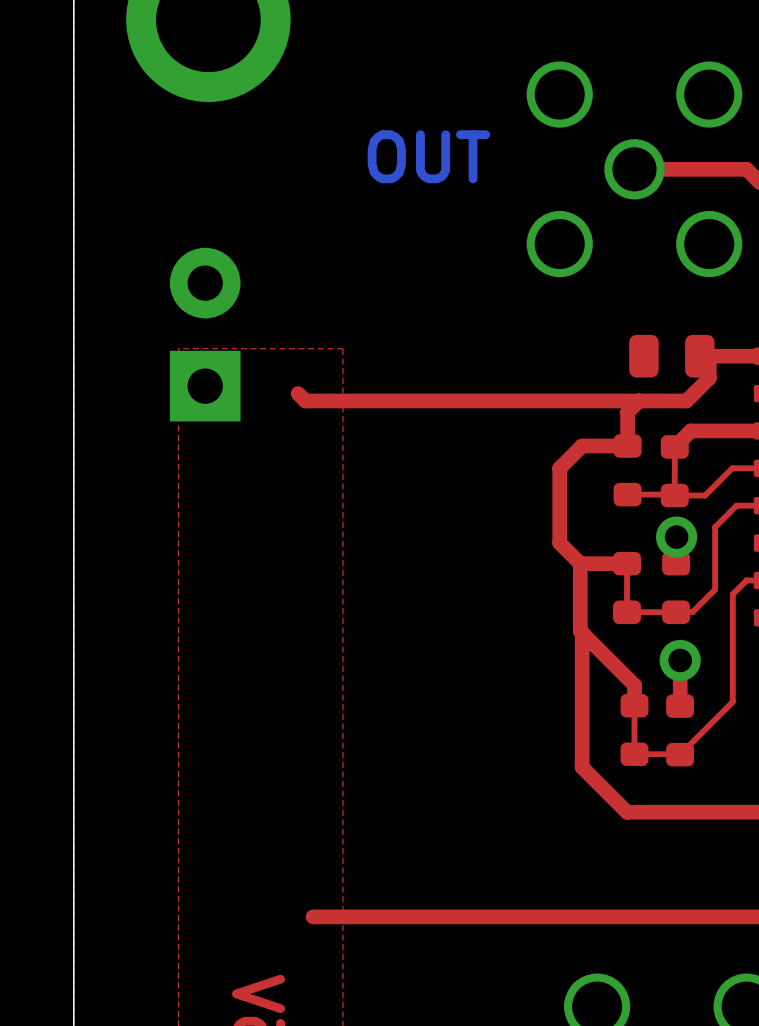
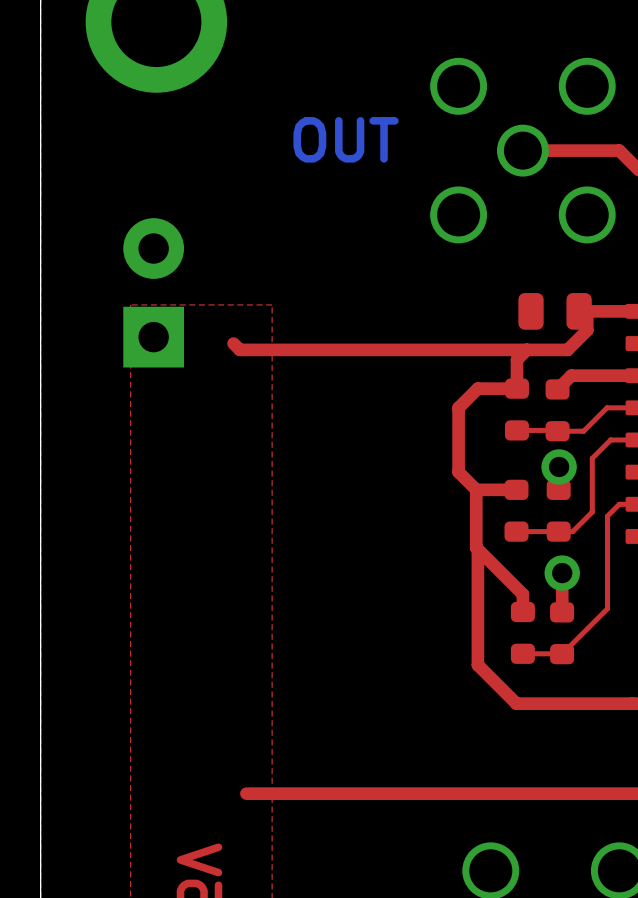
top track: (674, 449) (674, 492) -> none
top track: (627, 566) (626, 609) -> none
top track: (634, 708) (634, 751) -> none

